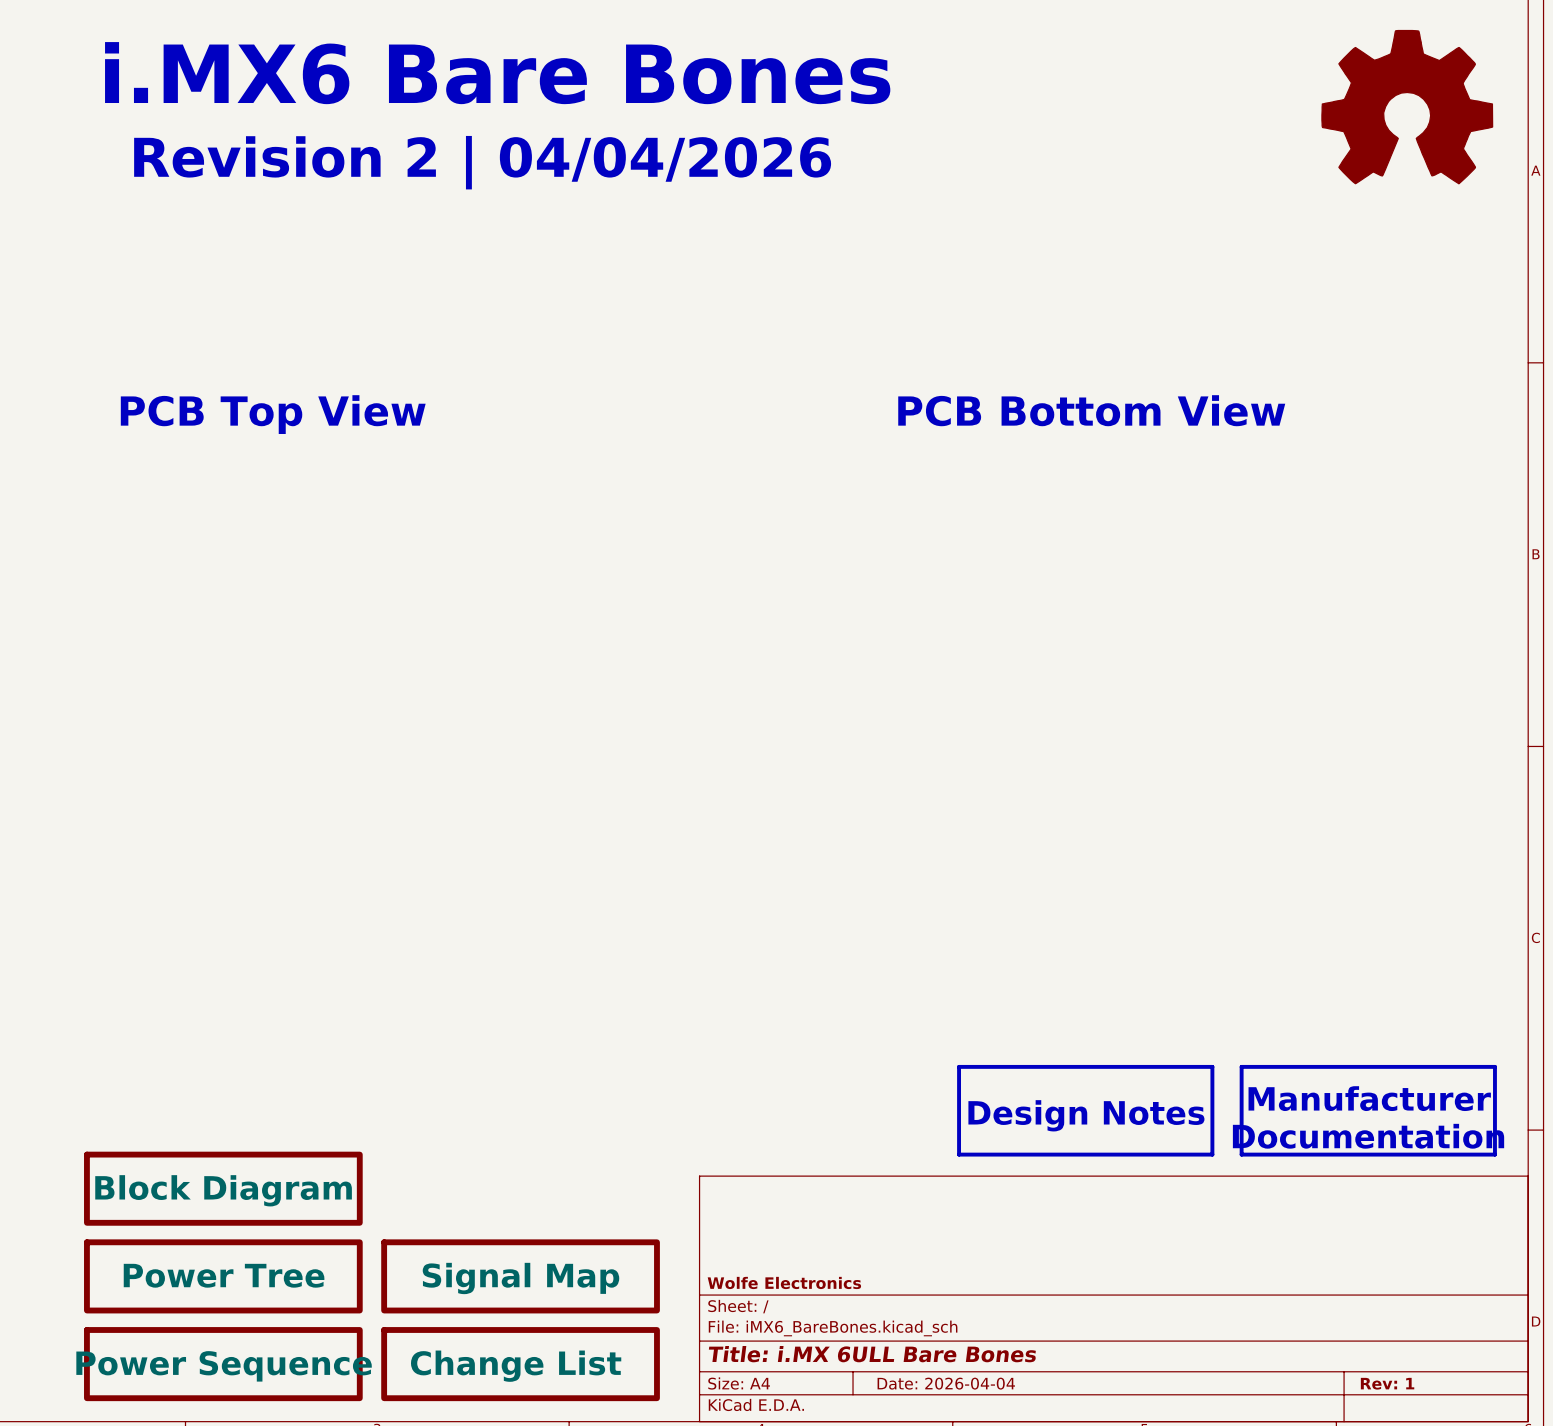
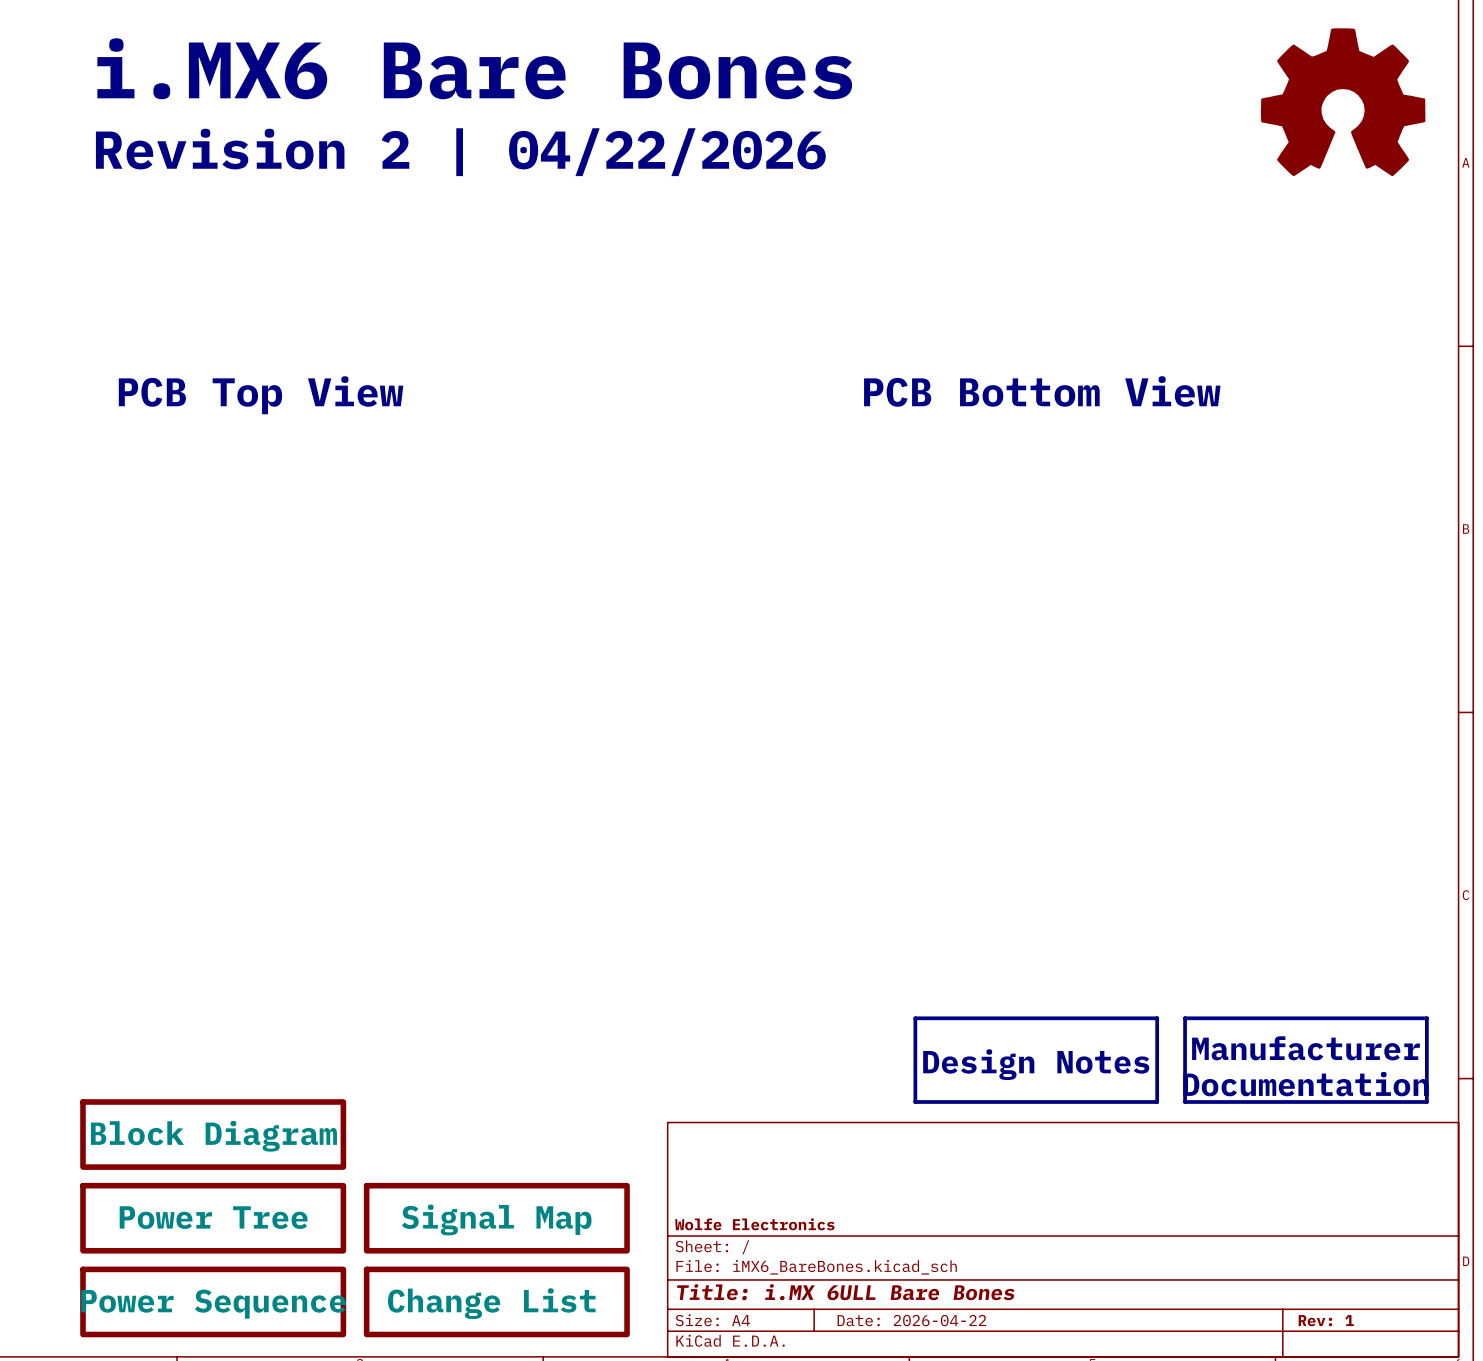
text: Revision 2 | 04/04/2026 (482, 162) -> Revision 2 | 04/22/2026 (460, 152)
title block: Date: 2026-04-04 (946, 1383) -> Date: 2026-04-22 (911, 1320)

